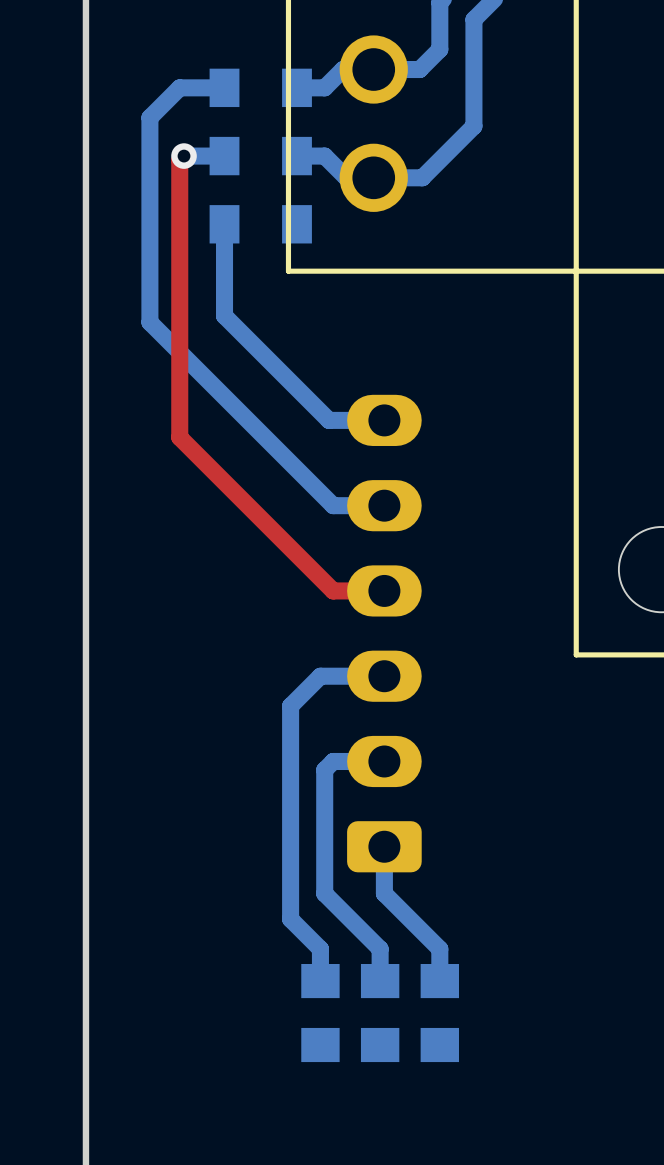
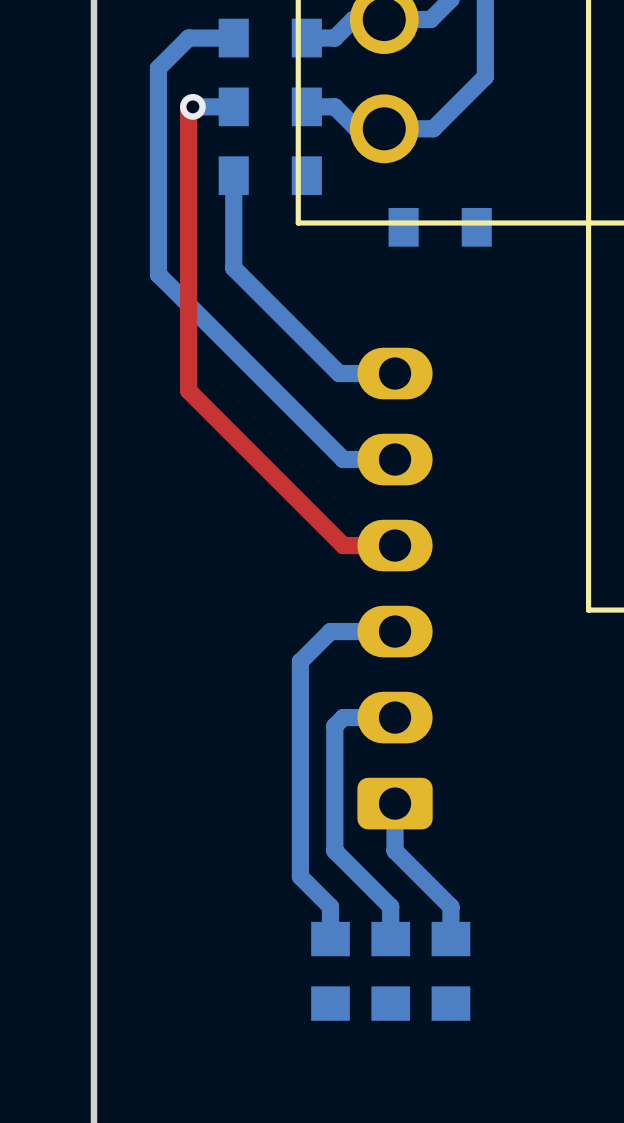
part: none -> (440, 227)

